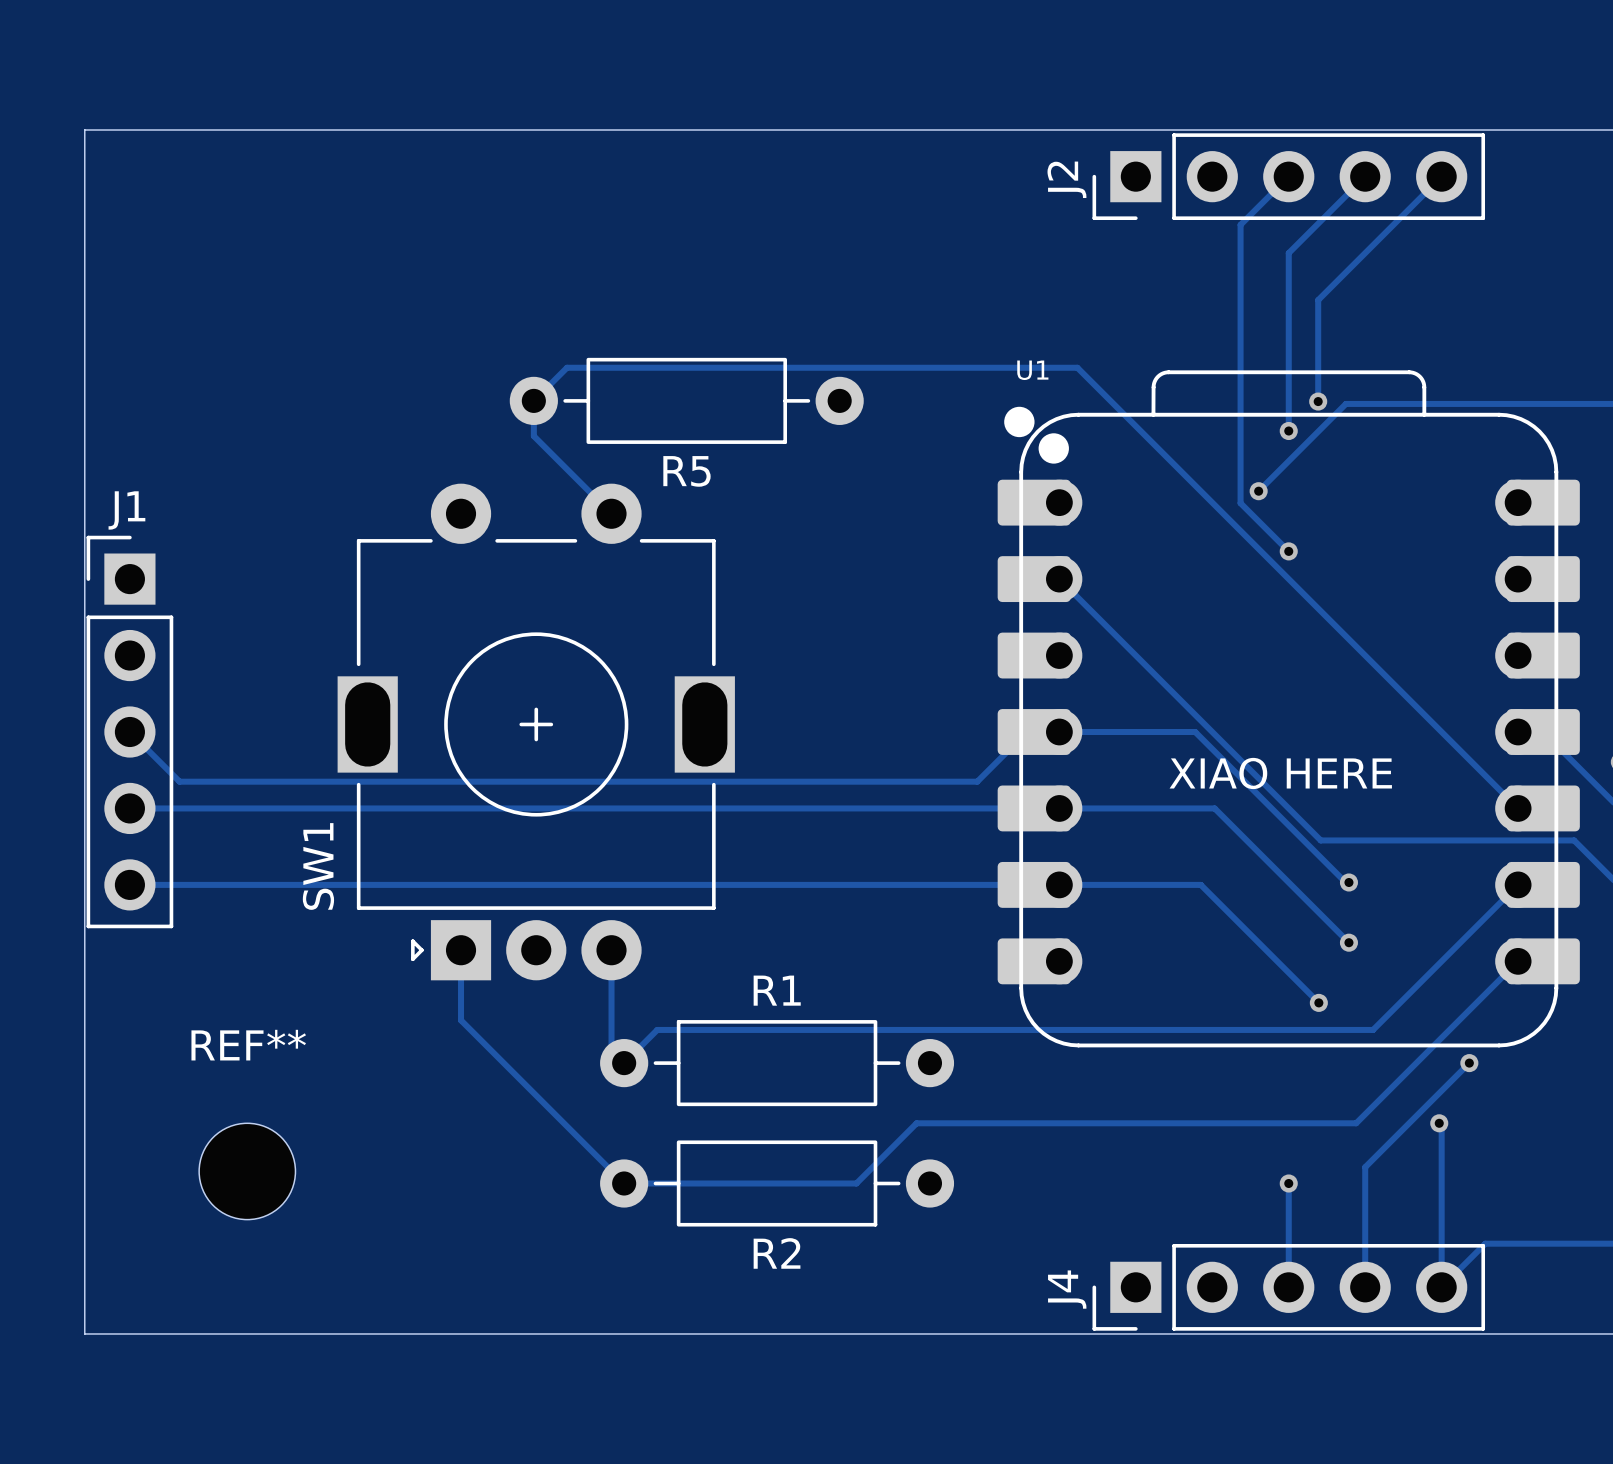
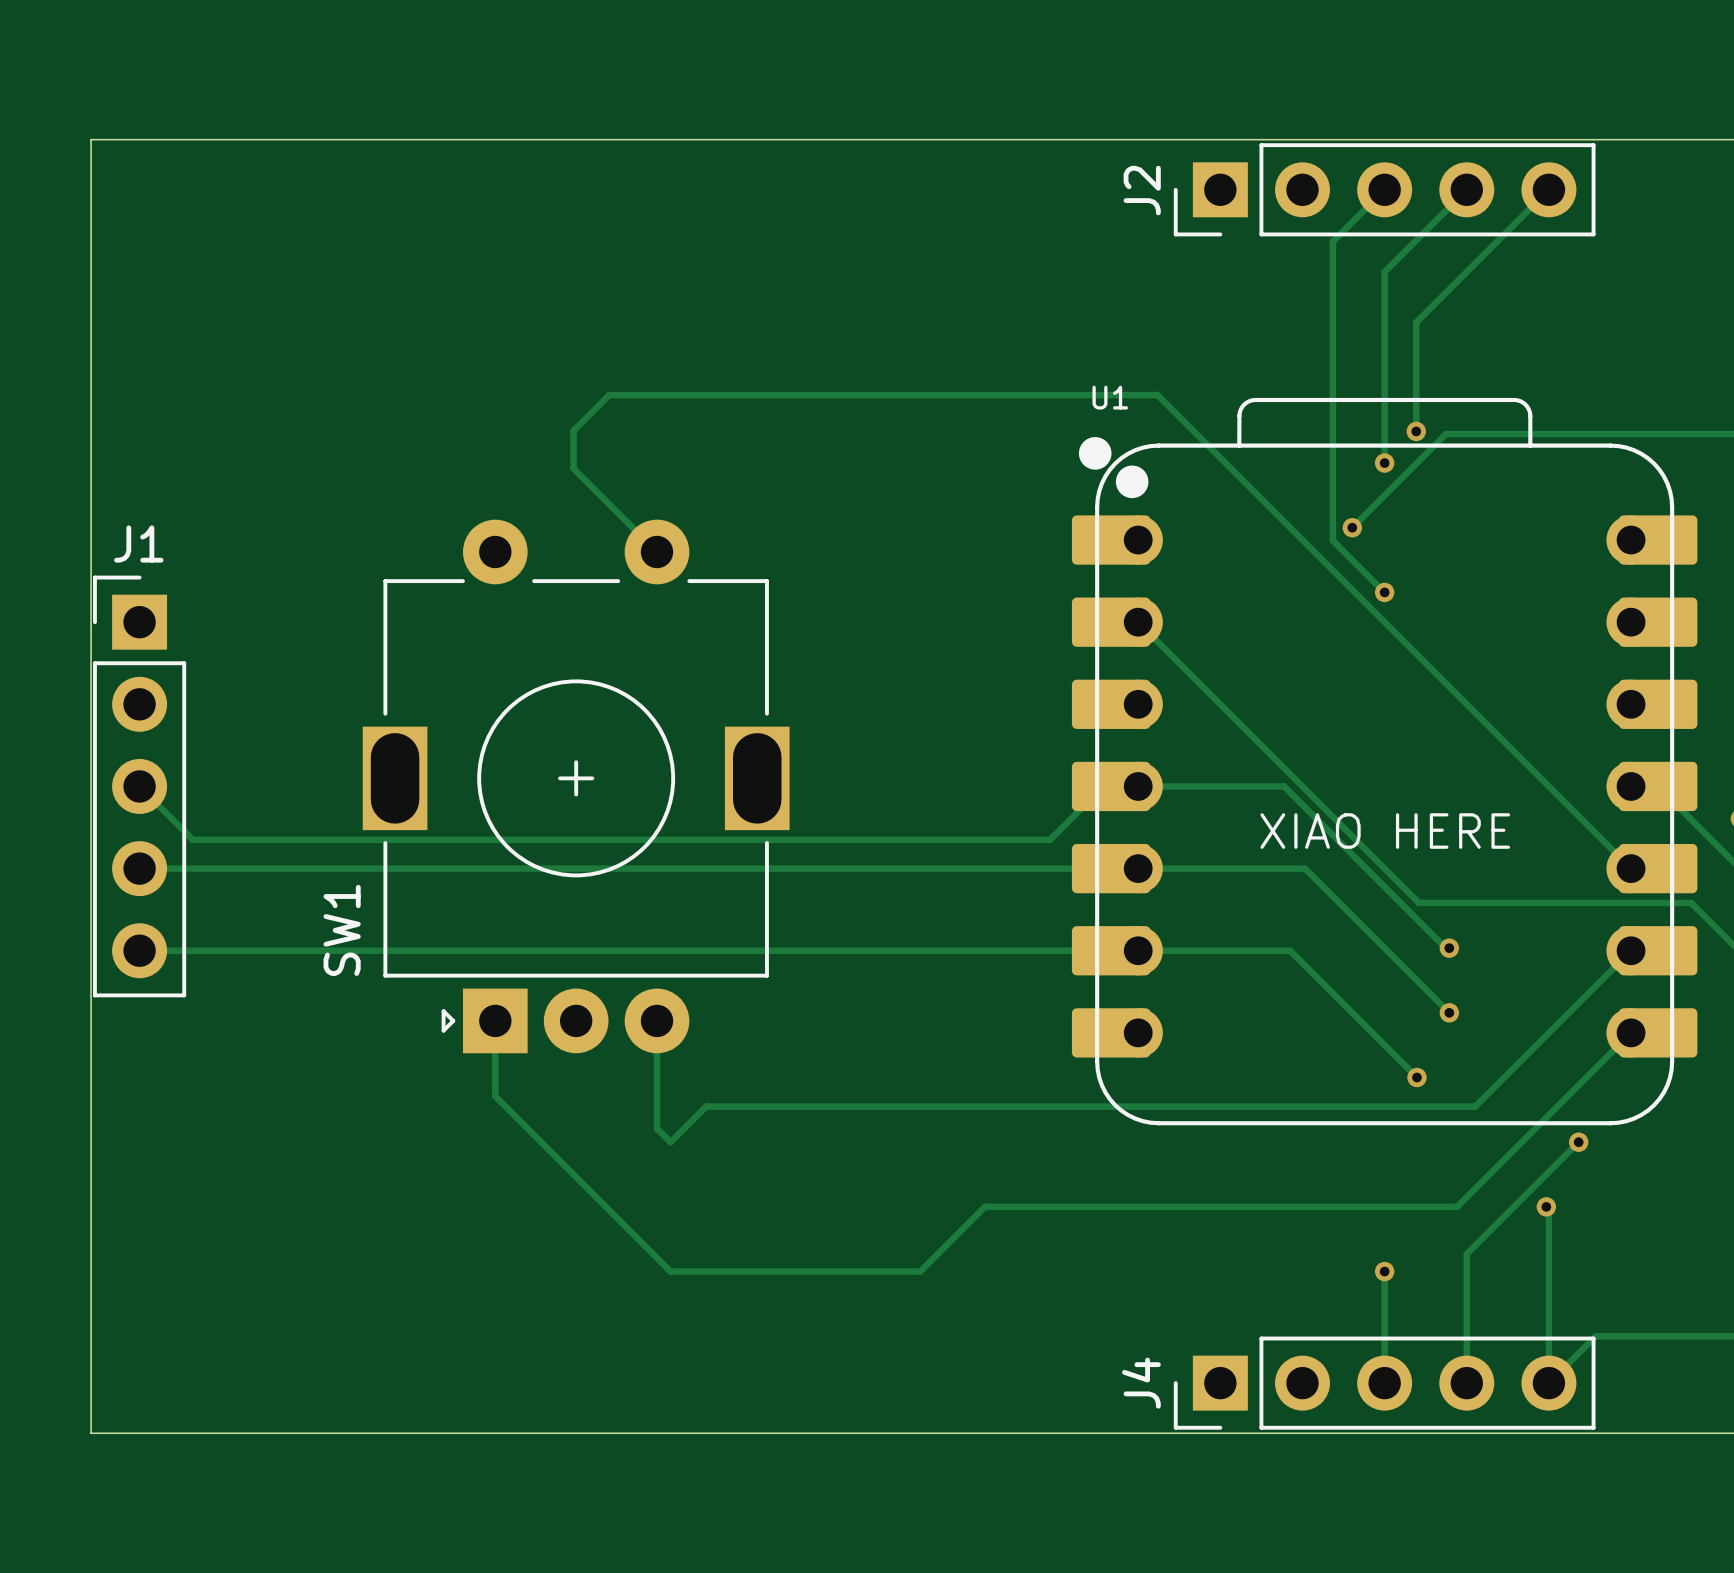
R5: (686, 400) -> none
R1: (777, 1063) -> none
REF**: (247, 1171) -> none
R2: (777, 1183) -> none

